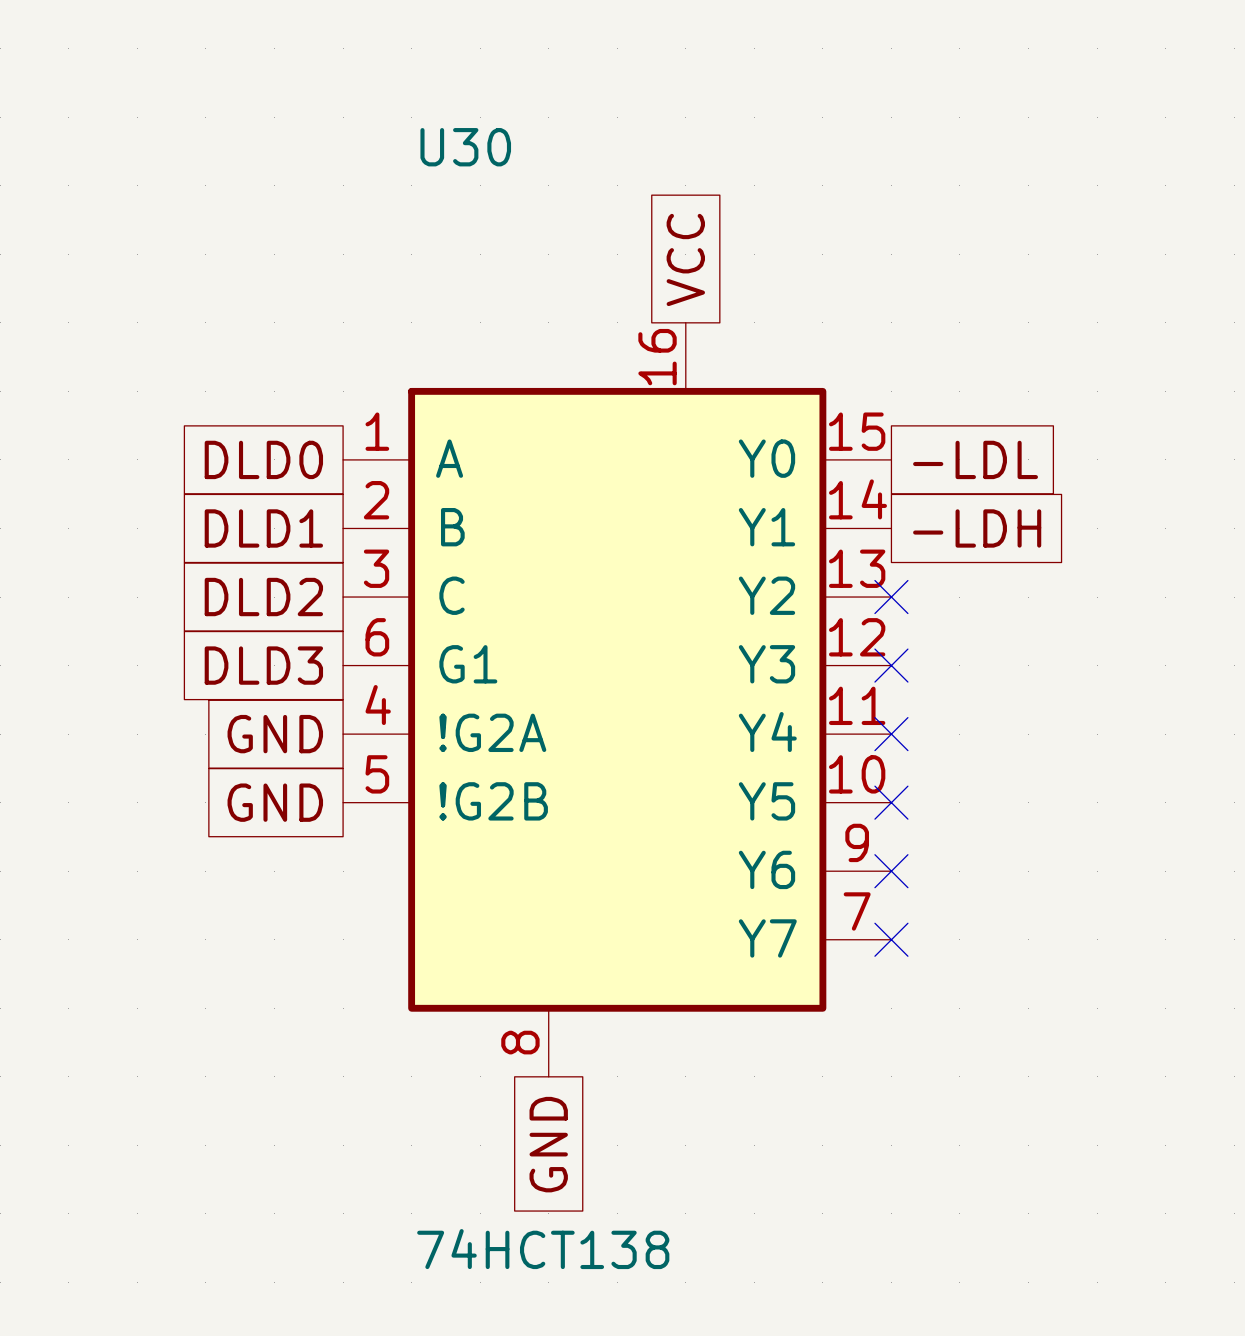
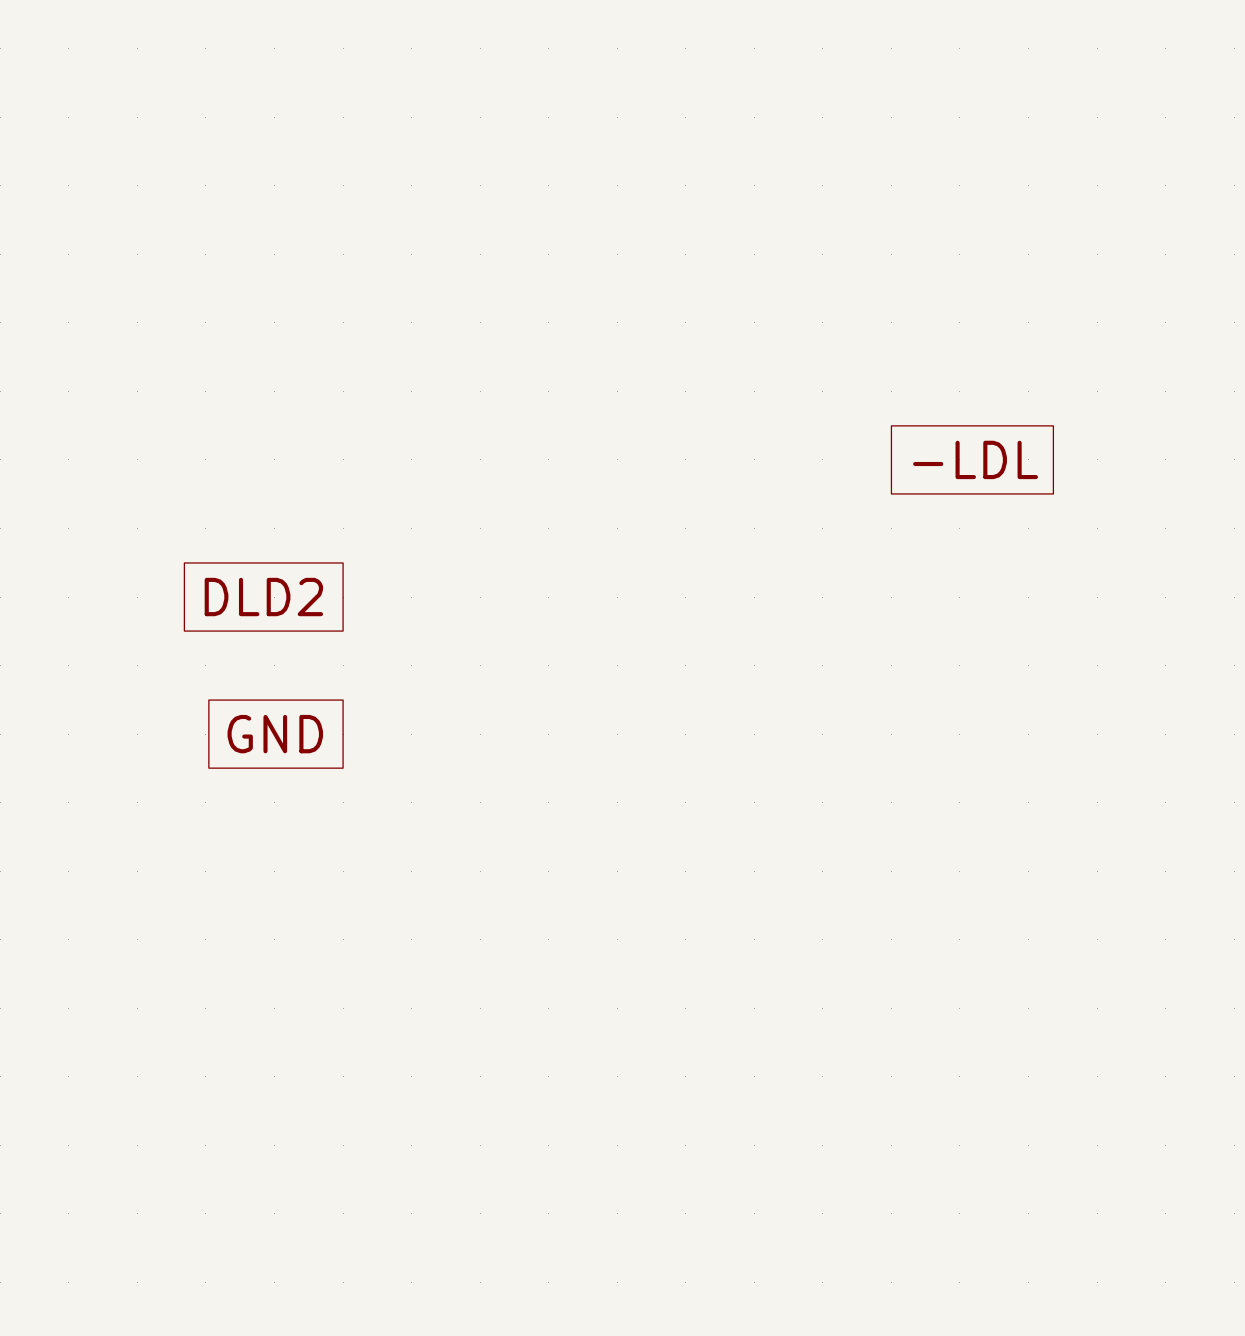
global label: VCC (685, 259) -> none
global label: DLD0 (263, 459) -> none
global label: DLD1 (263, 528) -> none
global label: -LDH (977, 528) -> none
no-connect mark: (891, 597) -> none
global label: DLD3 (263, 665) -> none
no-connect mark: (891, 665) -> none
U30: 74HCT138 (617, 699) -> none
no-connect mark: (891, 734) -> none
global label: GND (275, 802) -> none
no-connect mark: (891, 802) -> none
no-connect mark: (891, 871) -> none
no-connect mark: (891, 939) -> none
global label: GND (548, 1144) -> none

